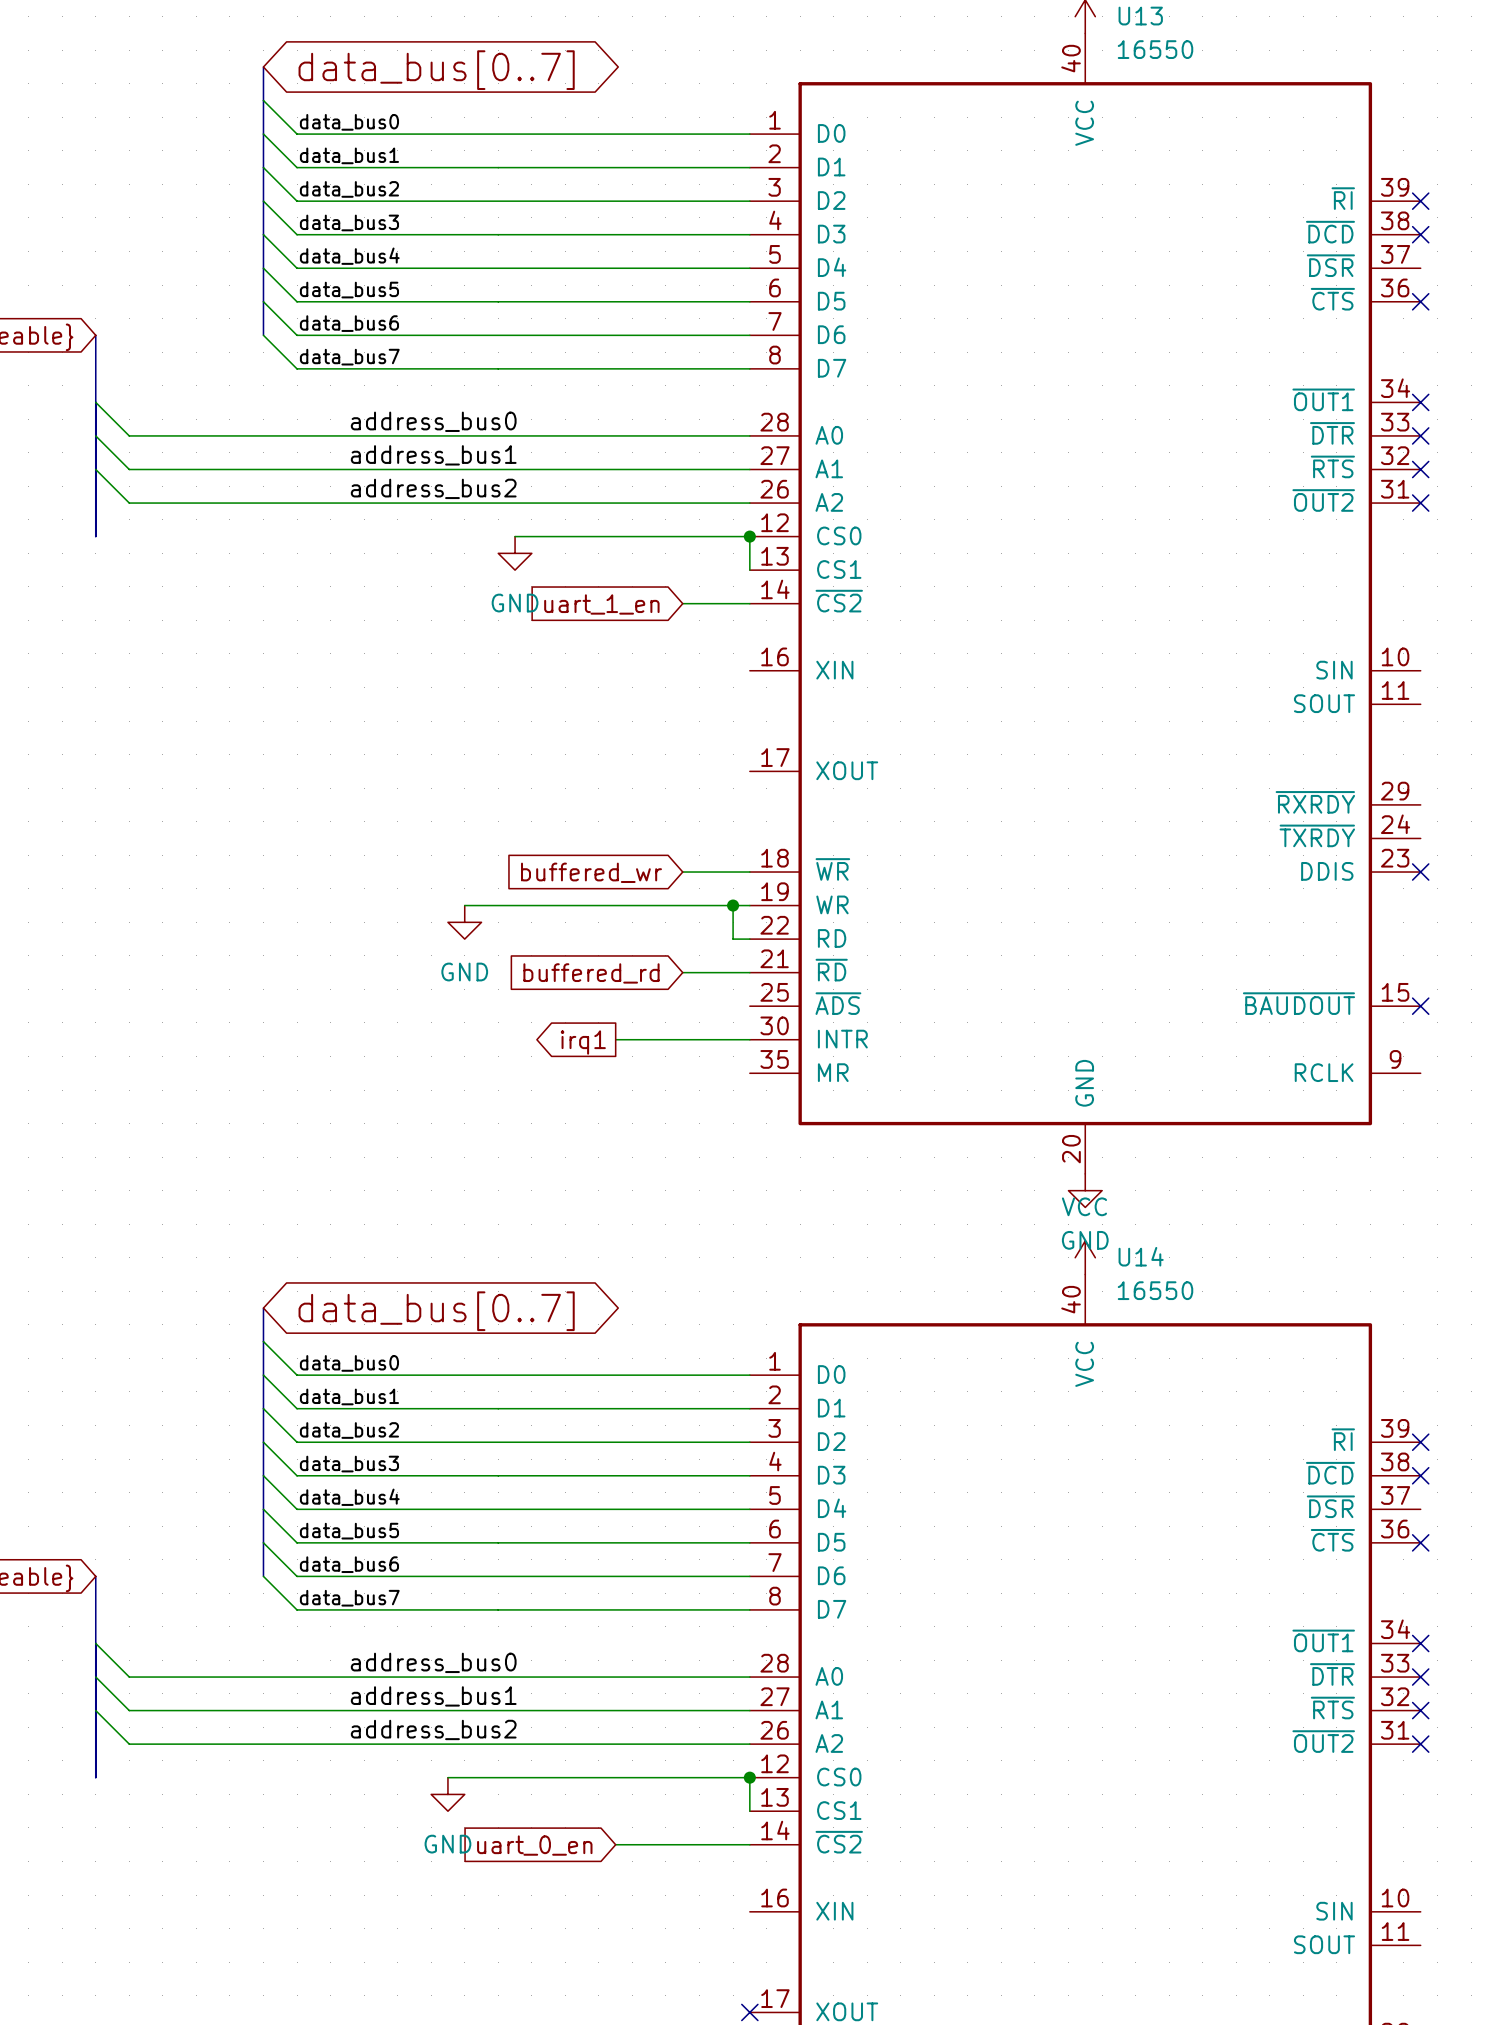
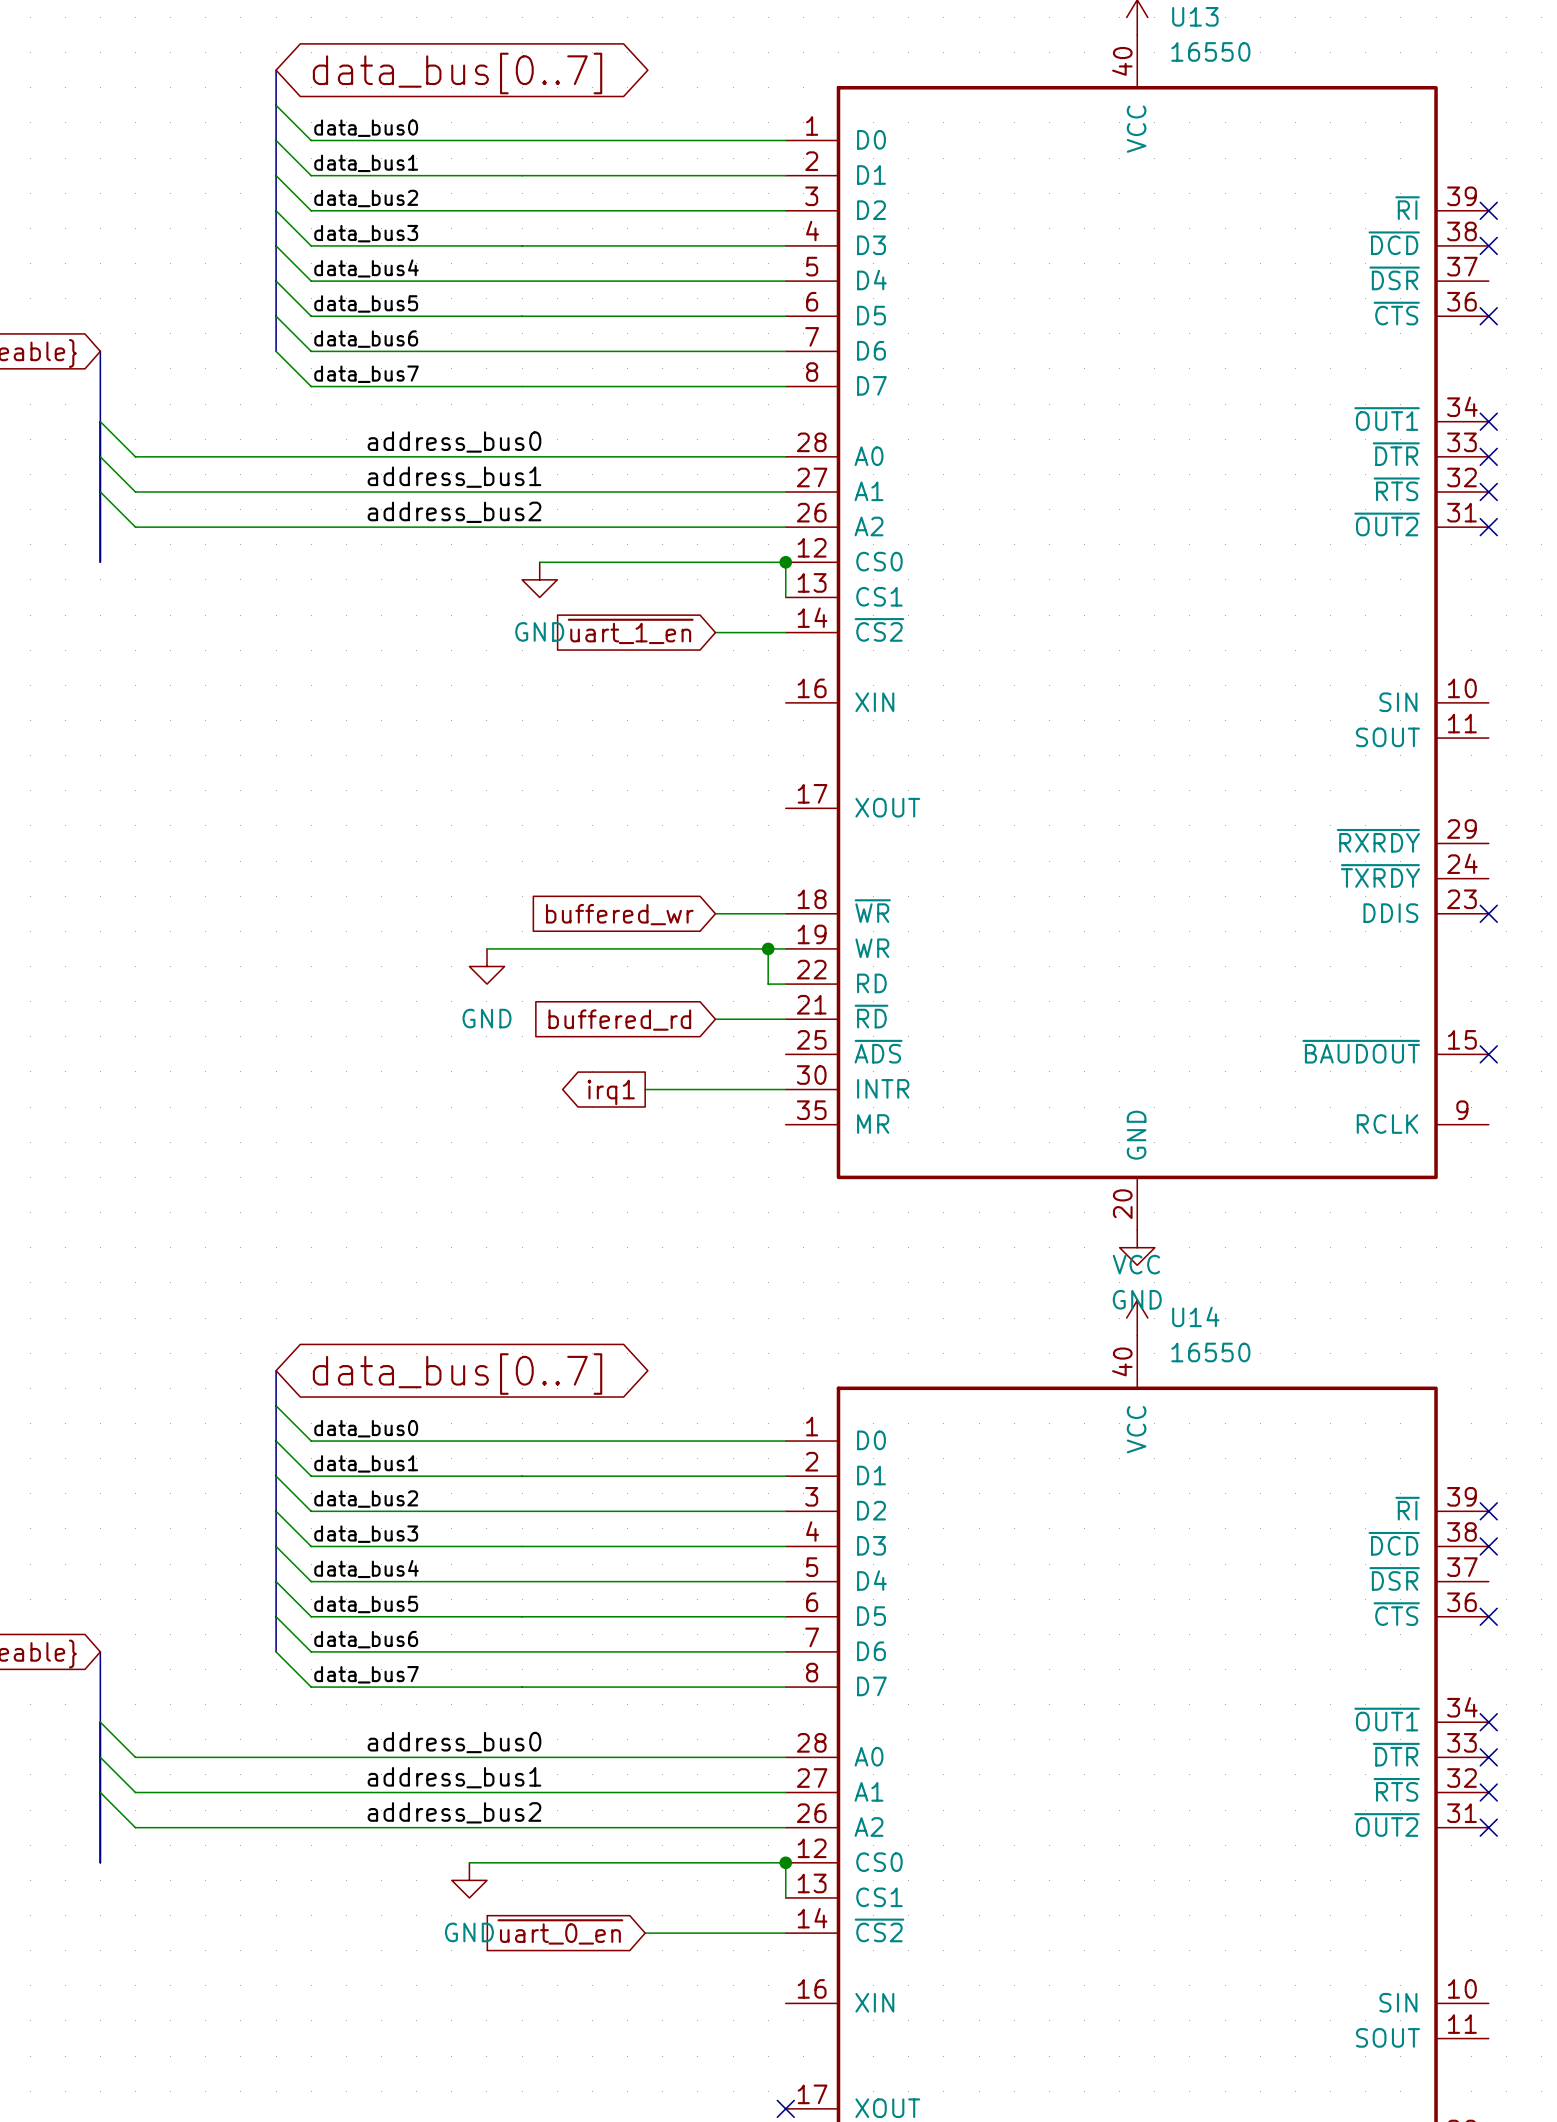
global label: uart_1_en (601, 604) -> ~{uart_1_en} (630, 631)
global label: uart_0_en (534, 1845) -> ~{uart_0_en} (560, 1931)

